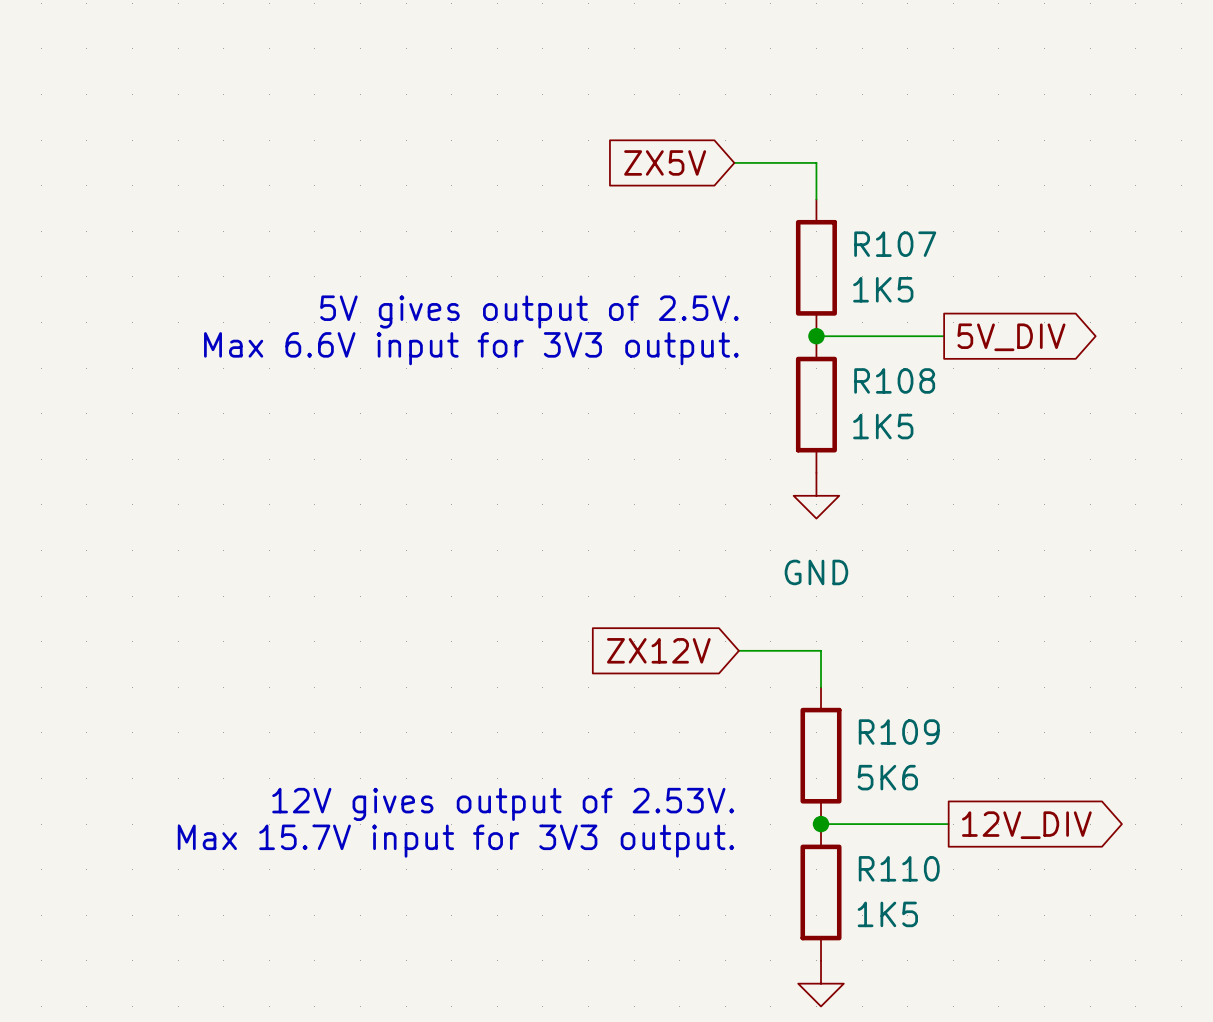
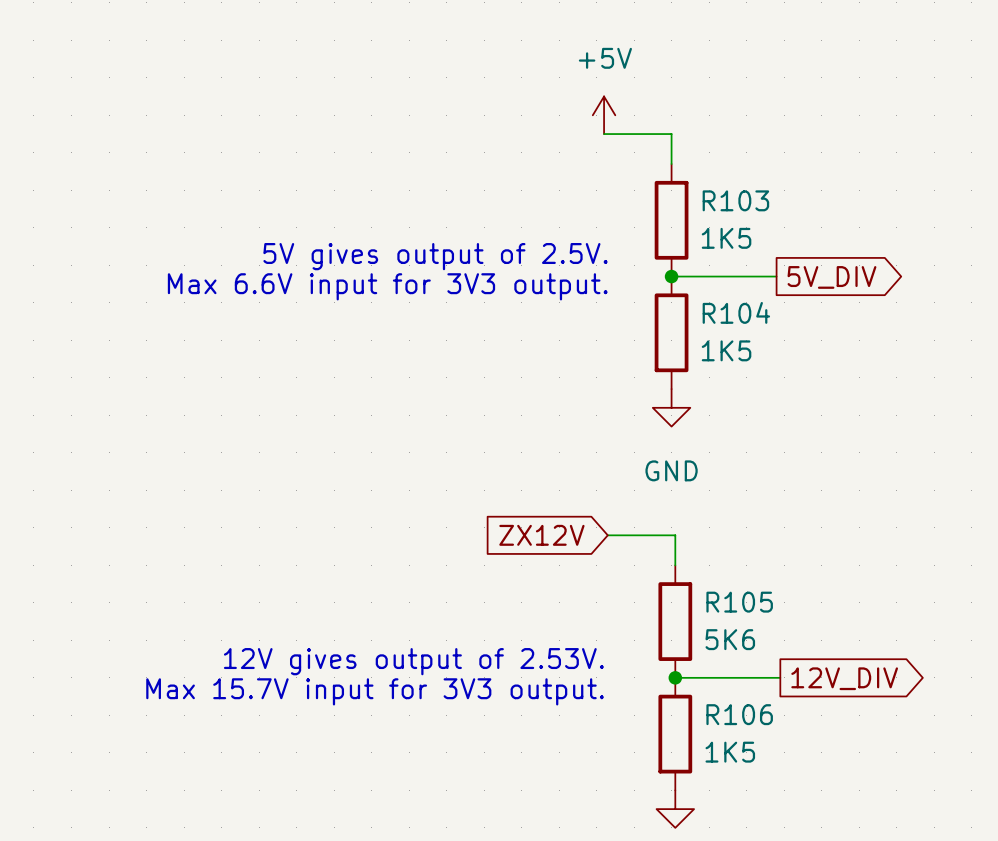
power symbol: none -> +5V (604, 115)
global label: ZX5V (665, 162) -> none
R107 name: R107 (895, 244) -> R103 (735, 200)
R108 name: R108 (894, 380) -> R104 (736, 312)
R109 name: R109 (899, 732) -> R105 (739, 602)
R110 name: R110 (899, 868) -> R106 (739, 714)

